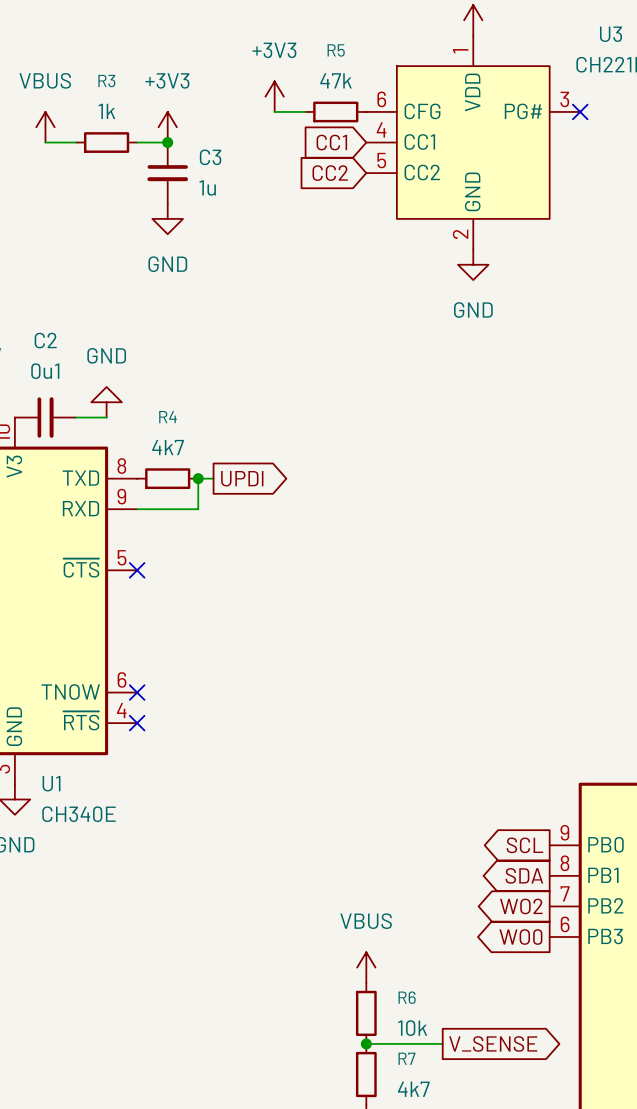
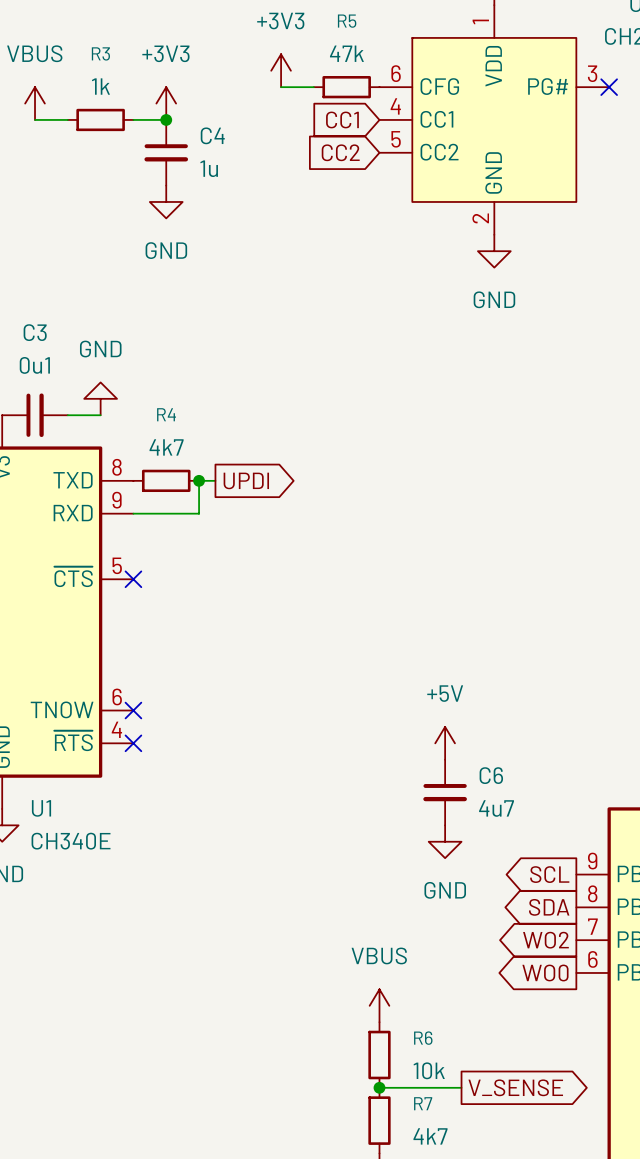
C3 name: C3 (210, 157) -> C4 (212, 135)
C2 name: C2 (45, 340) -> C3 (35, 332)
power symbol: none -> +5V (445, 743)
C6: none -> 4u7 (445, 792)
power symbol: none -> GND (445, 841)

